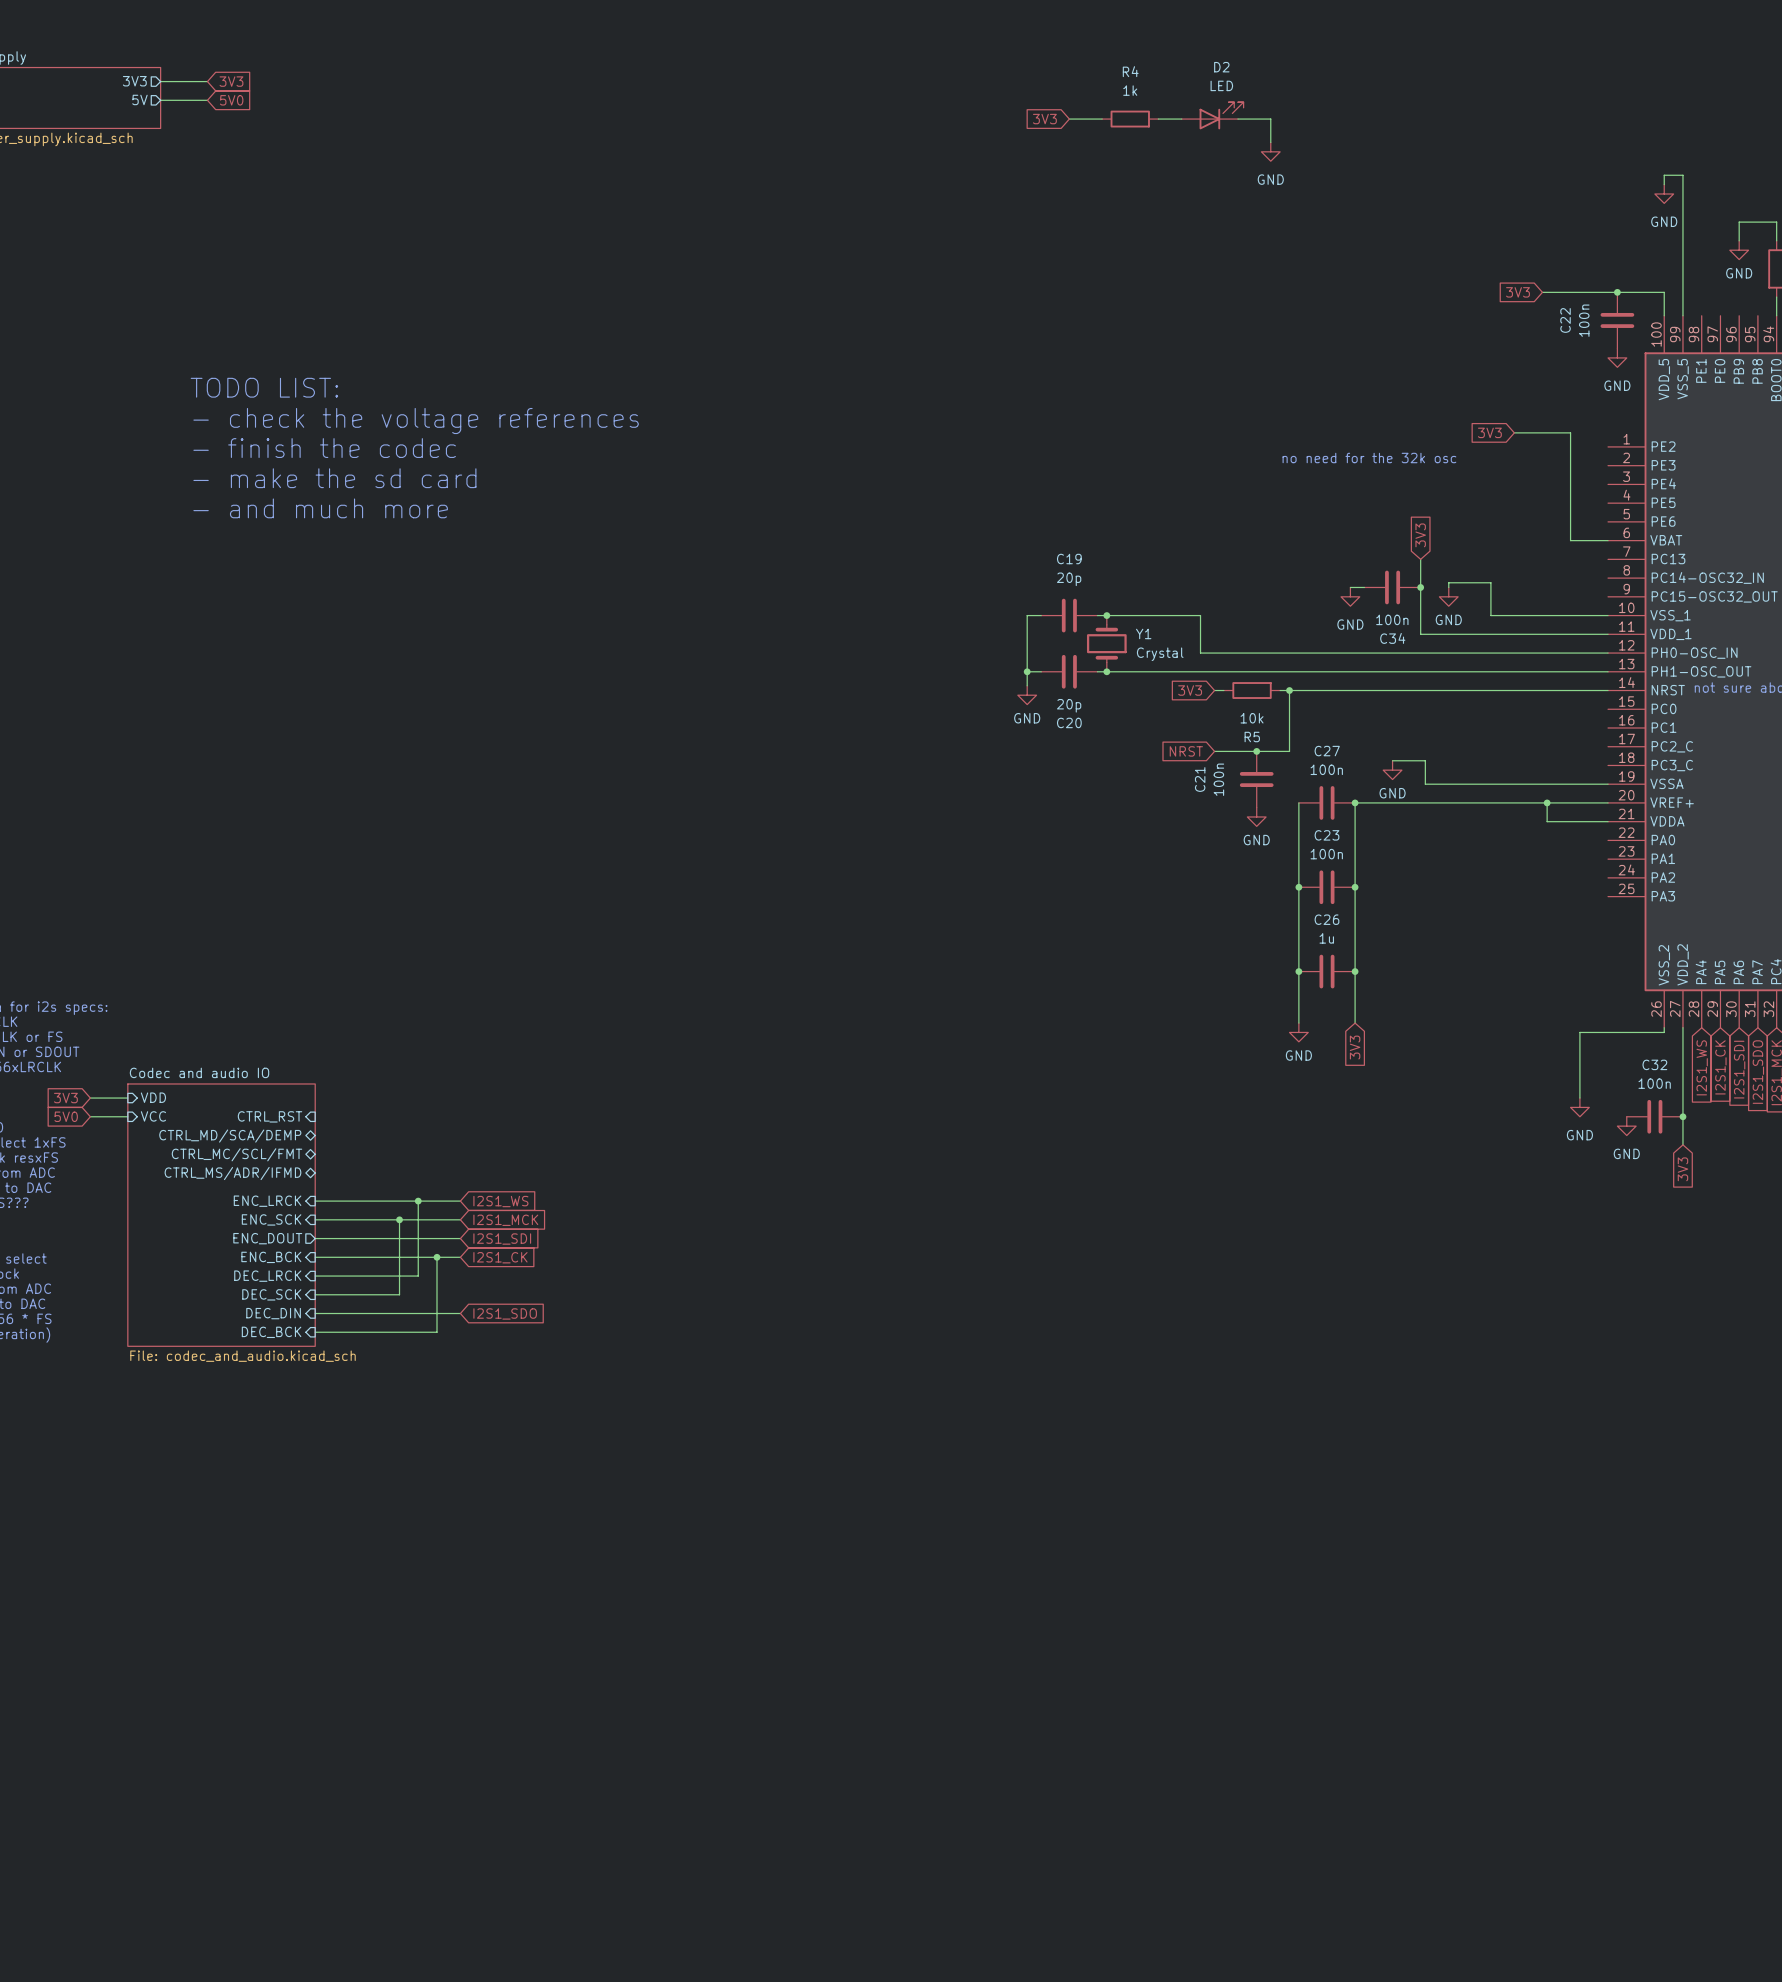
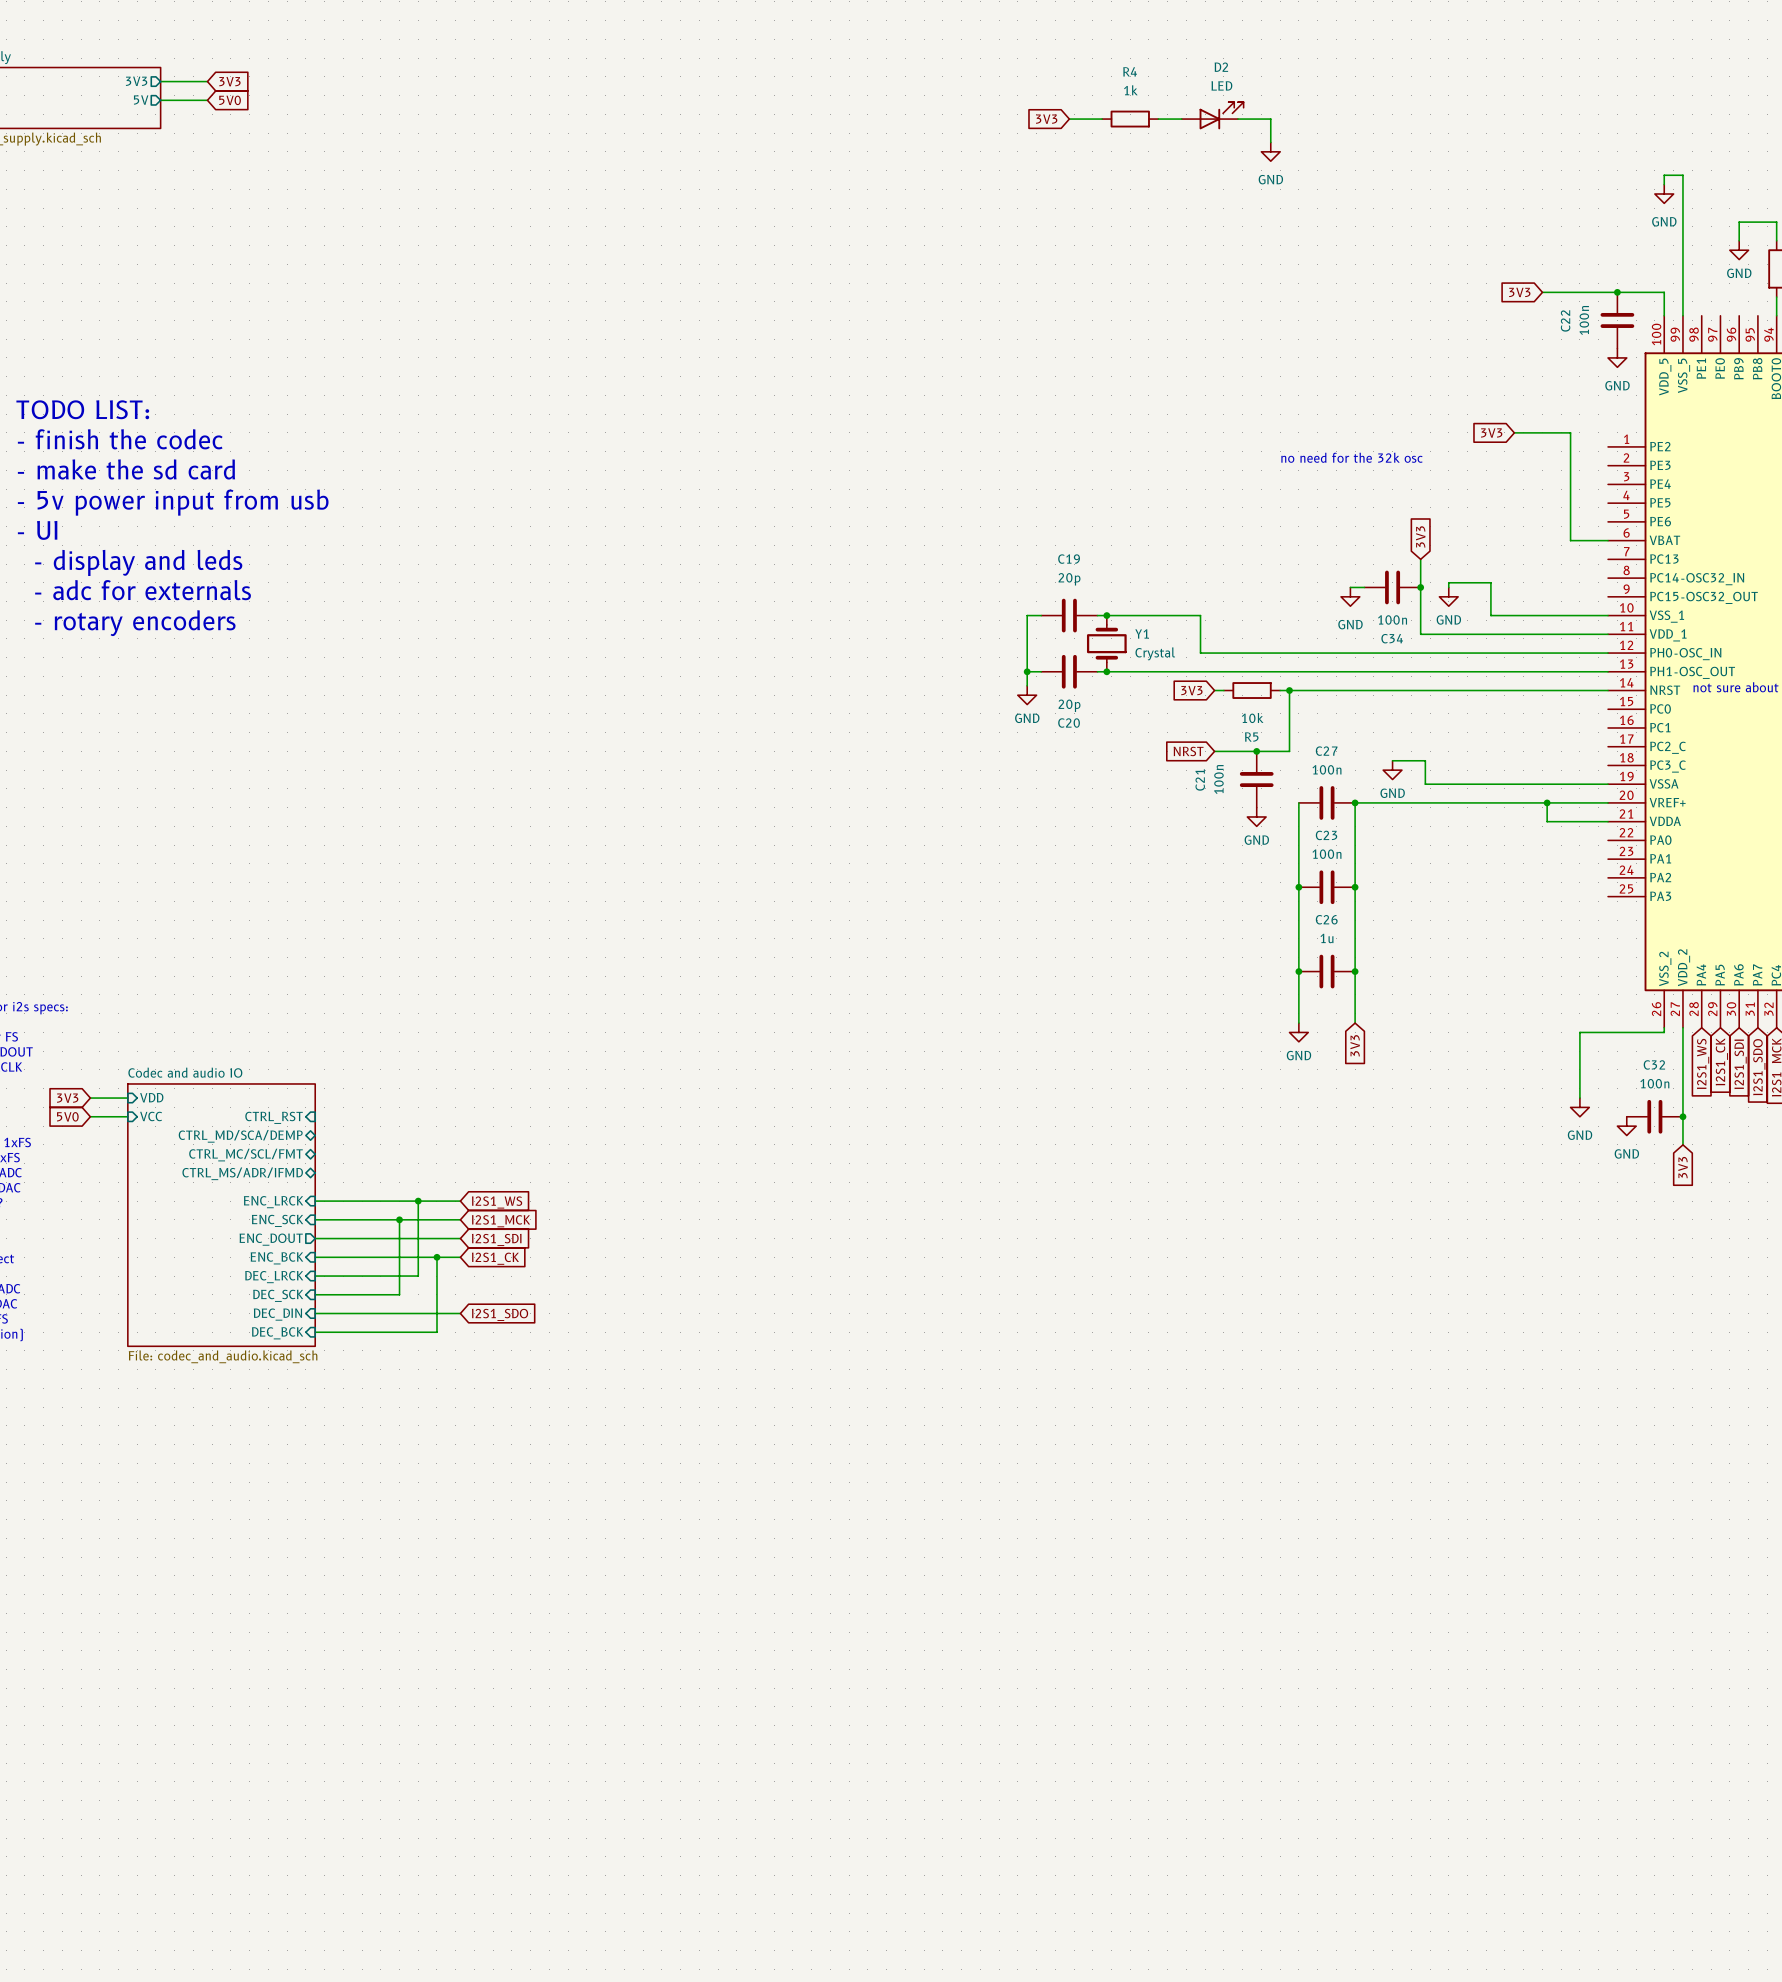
text position: TODO LIST: (264, 387) -> TODO LIST: (82, 409)
text: - check the voltage references (416, 421) -> none
text position: - finish the codec (324, 448) -> - finish the codec (120, 439)
text position: - make the sd card (334, 478) -> - make the sd card (126, 469)
text: none -> - 5v power input from usb (173, 502)
text: - and much more (320, 508) -> none
text: none -> - UI (37, 530)
text: none -> - display and leds (138, 562)
text: none -> - adc for externals (143, 590)
text: none -> - rotary encoders (135, 623)

